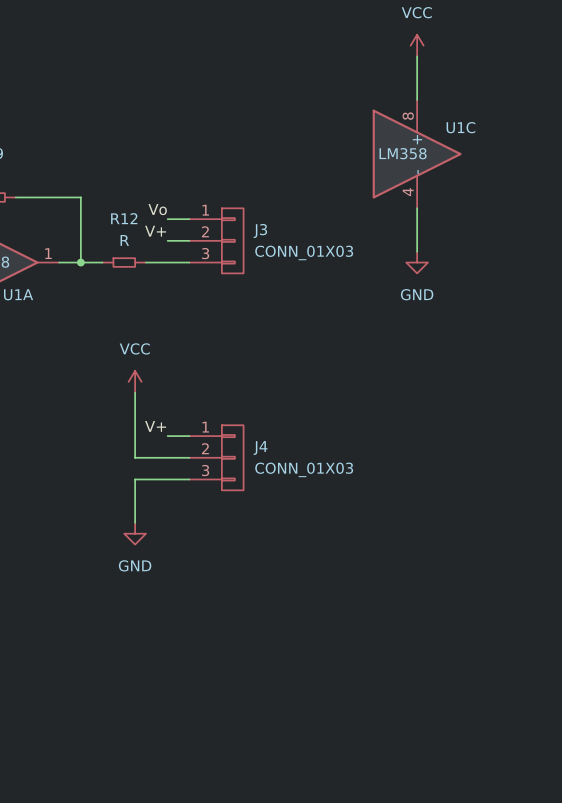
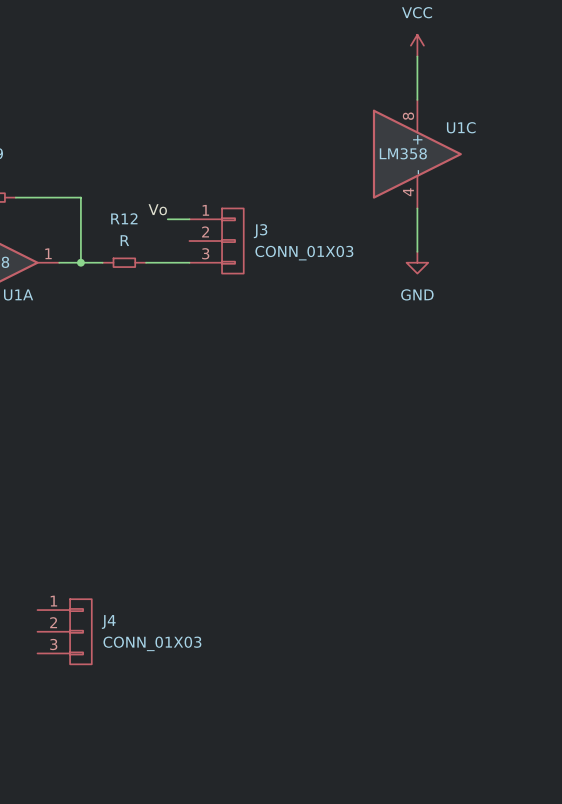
label: V+ (155, 231) -> none
wire: (167, 240) (189, 240) -> none
power symbol: VCC (135, 381) -> none
wire: (135, 392) (135, 457) (189, 457) -> none
label: V+ (155, 426) -> none
wire: (167, 436) (189, 436) -> none
J4 position: (216, 457) -> (64, 631)
wire: (189, 479) (135, 479) (135, 522) -> none
power symbol: GND (135, 533) -> none

